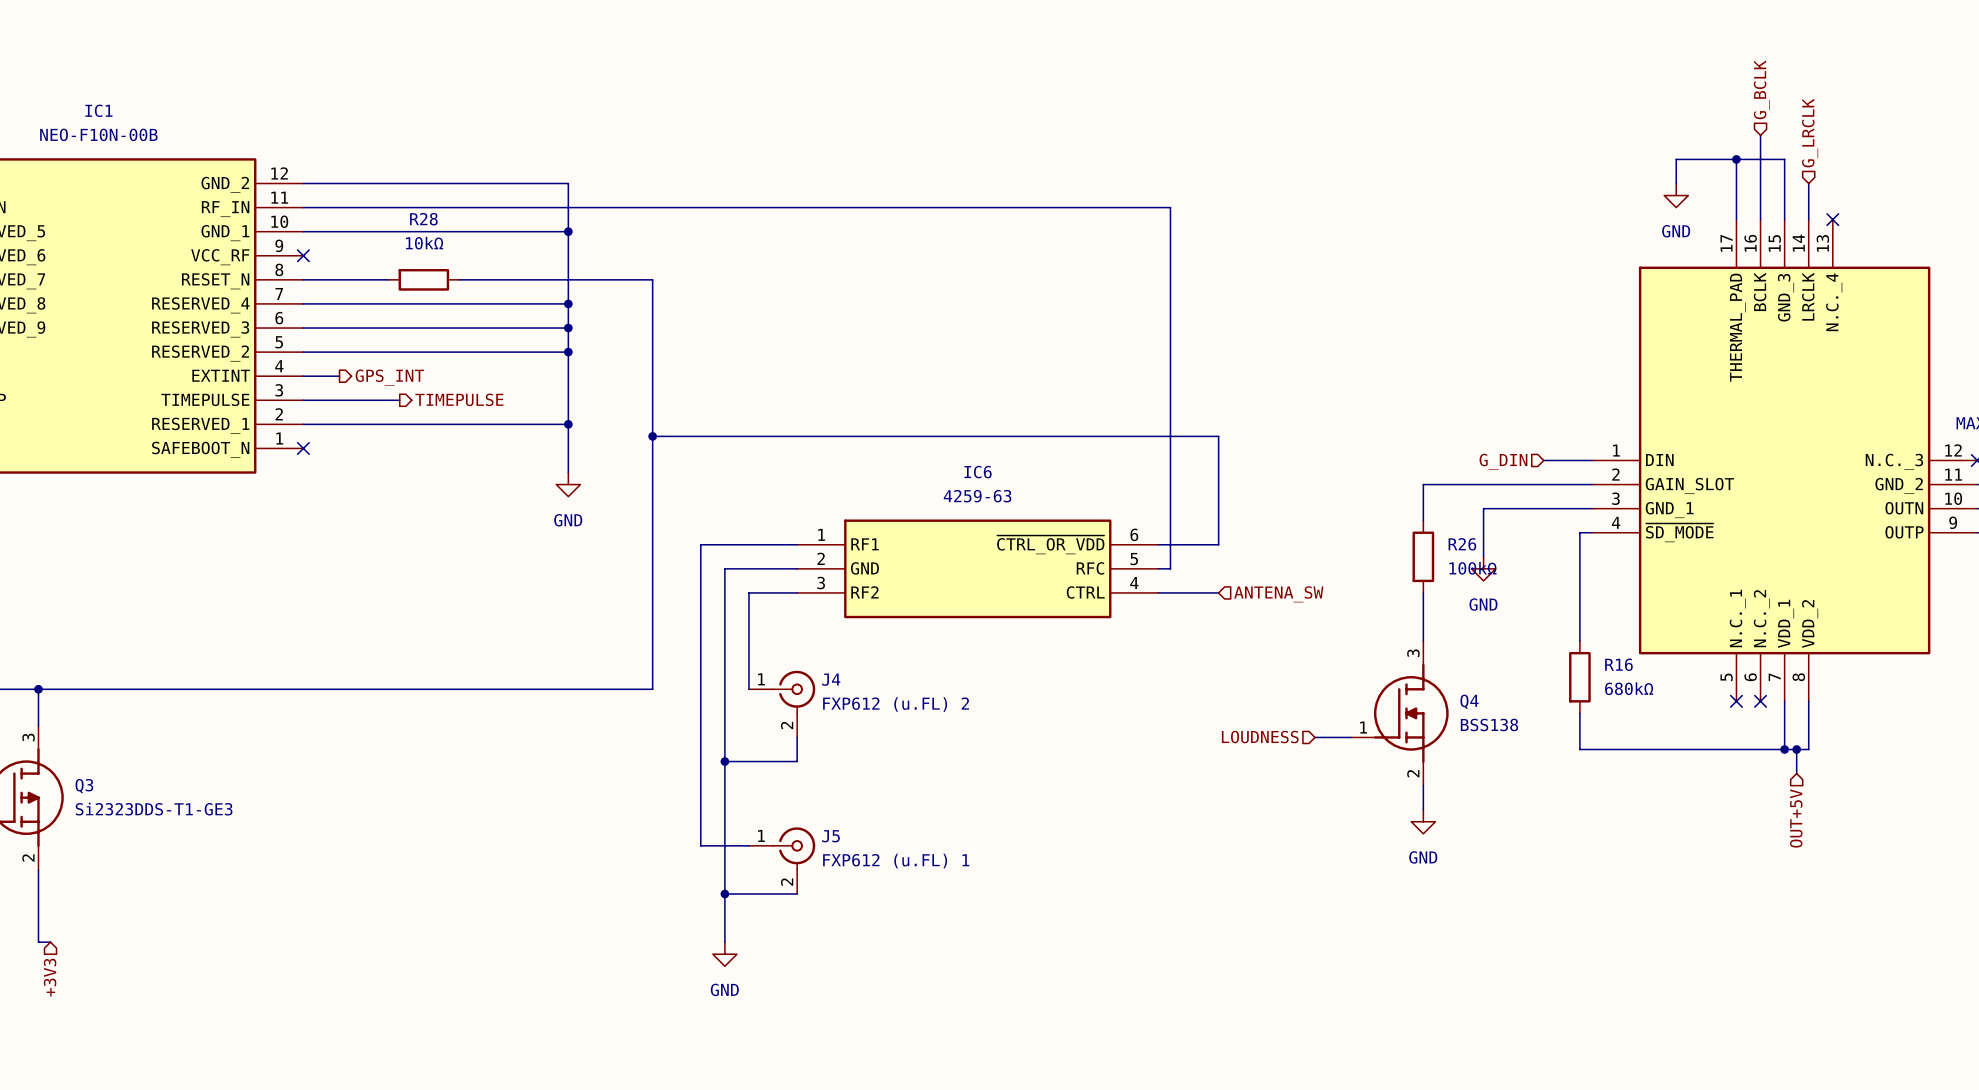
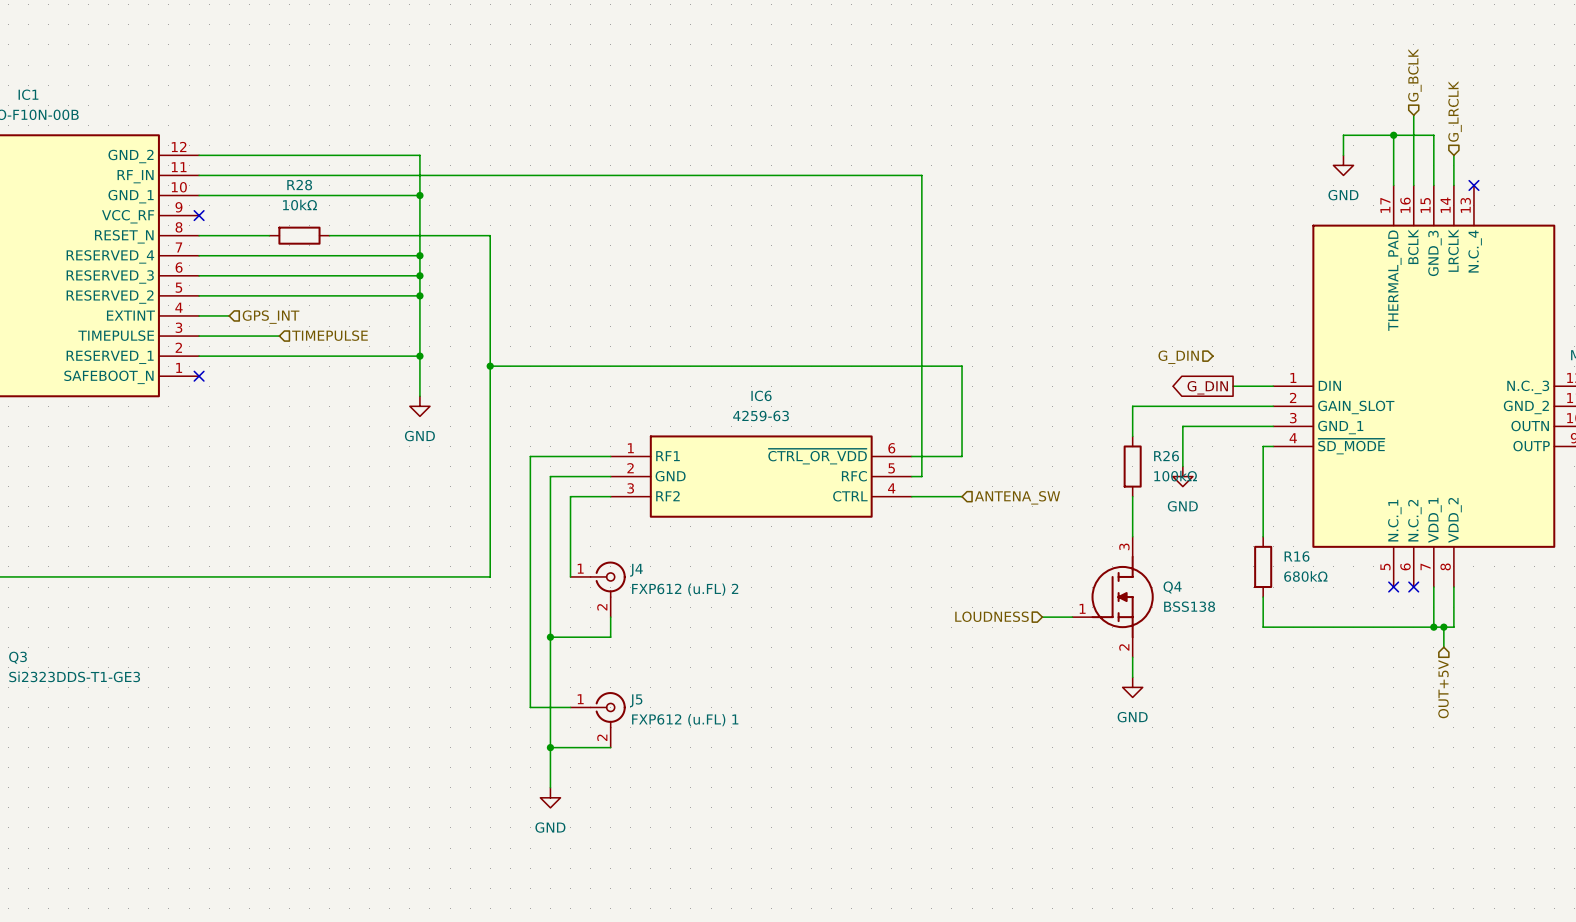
hierarchical label shape: output (389, 377) -> input (271, 317)
hierarchical label shape: output (459, 399) -> input (329, 335)
hierarchical label position: G_DIN (1503, 461) -> G_DIN (1178, 357)
global label: none -> G_DIN (1207, 387)

